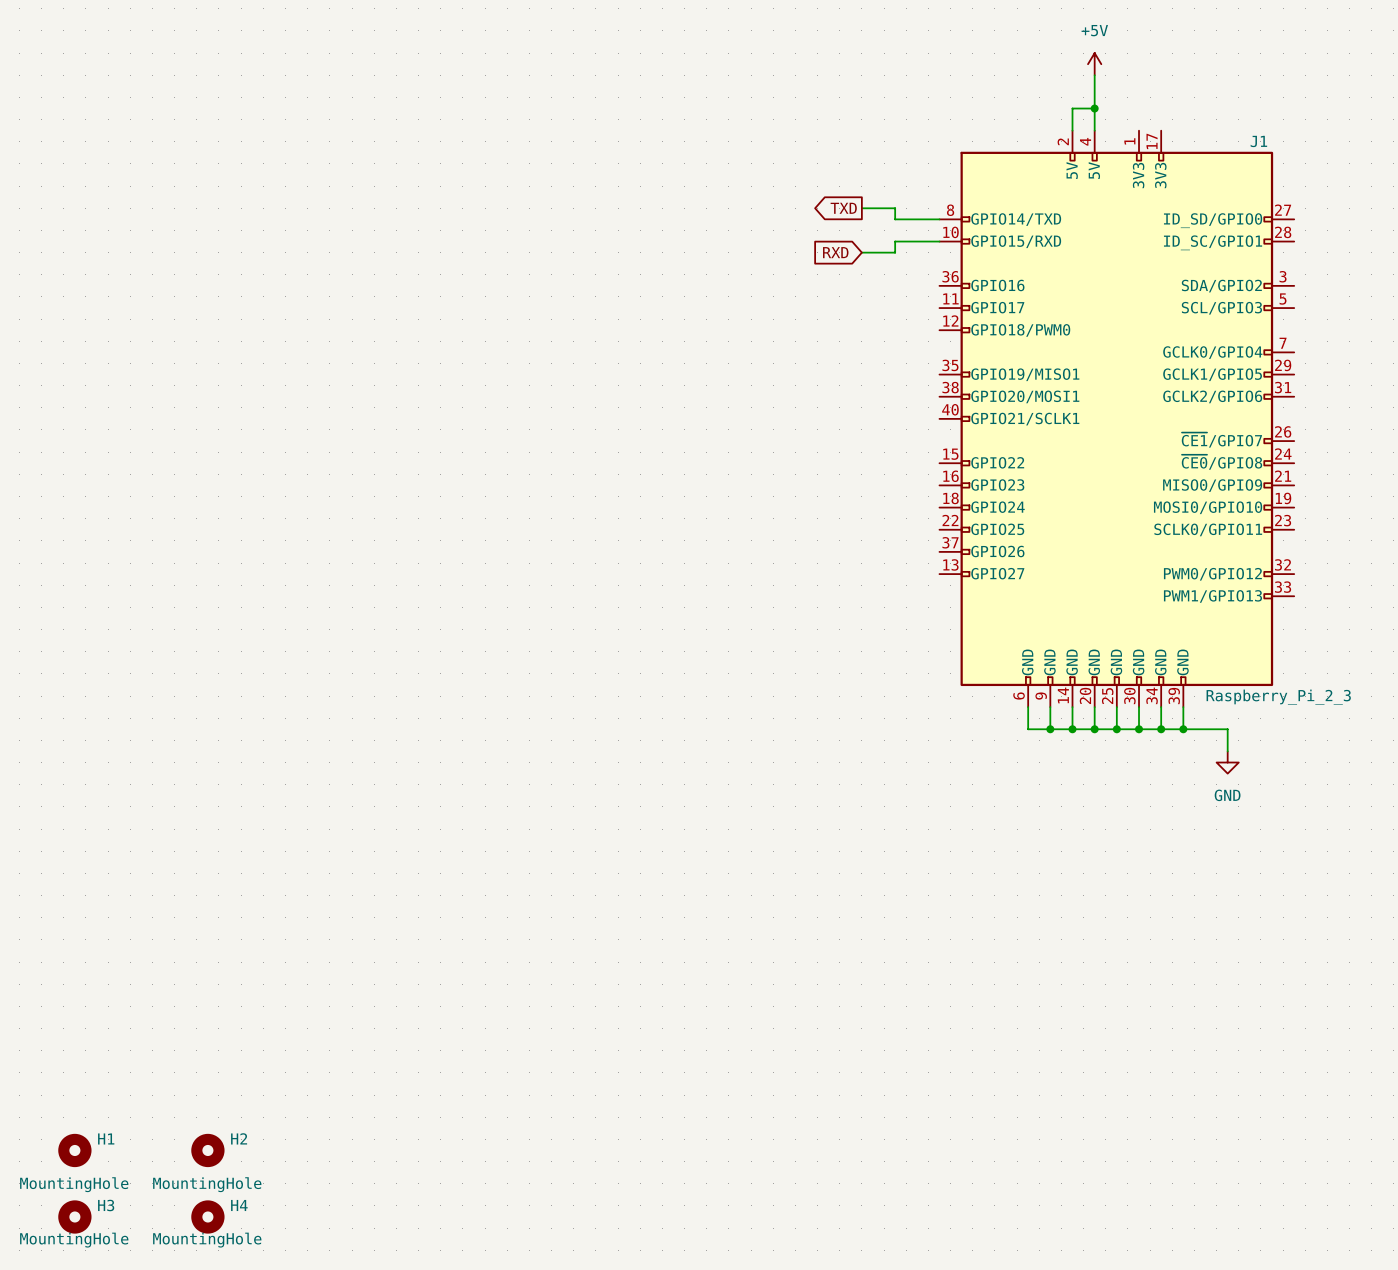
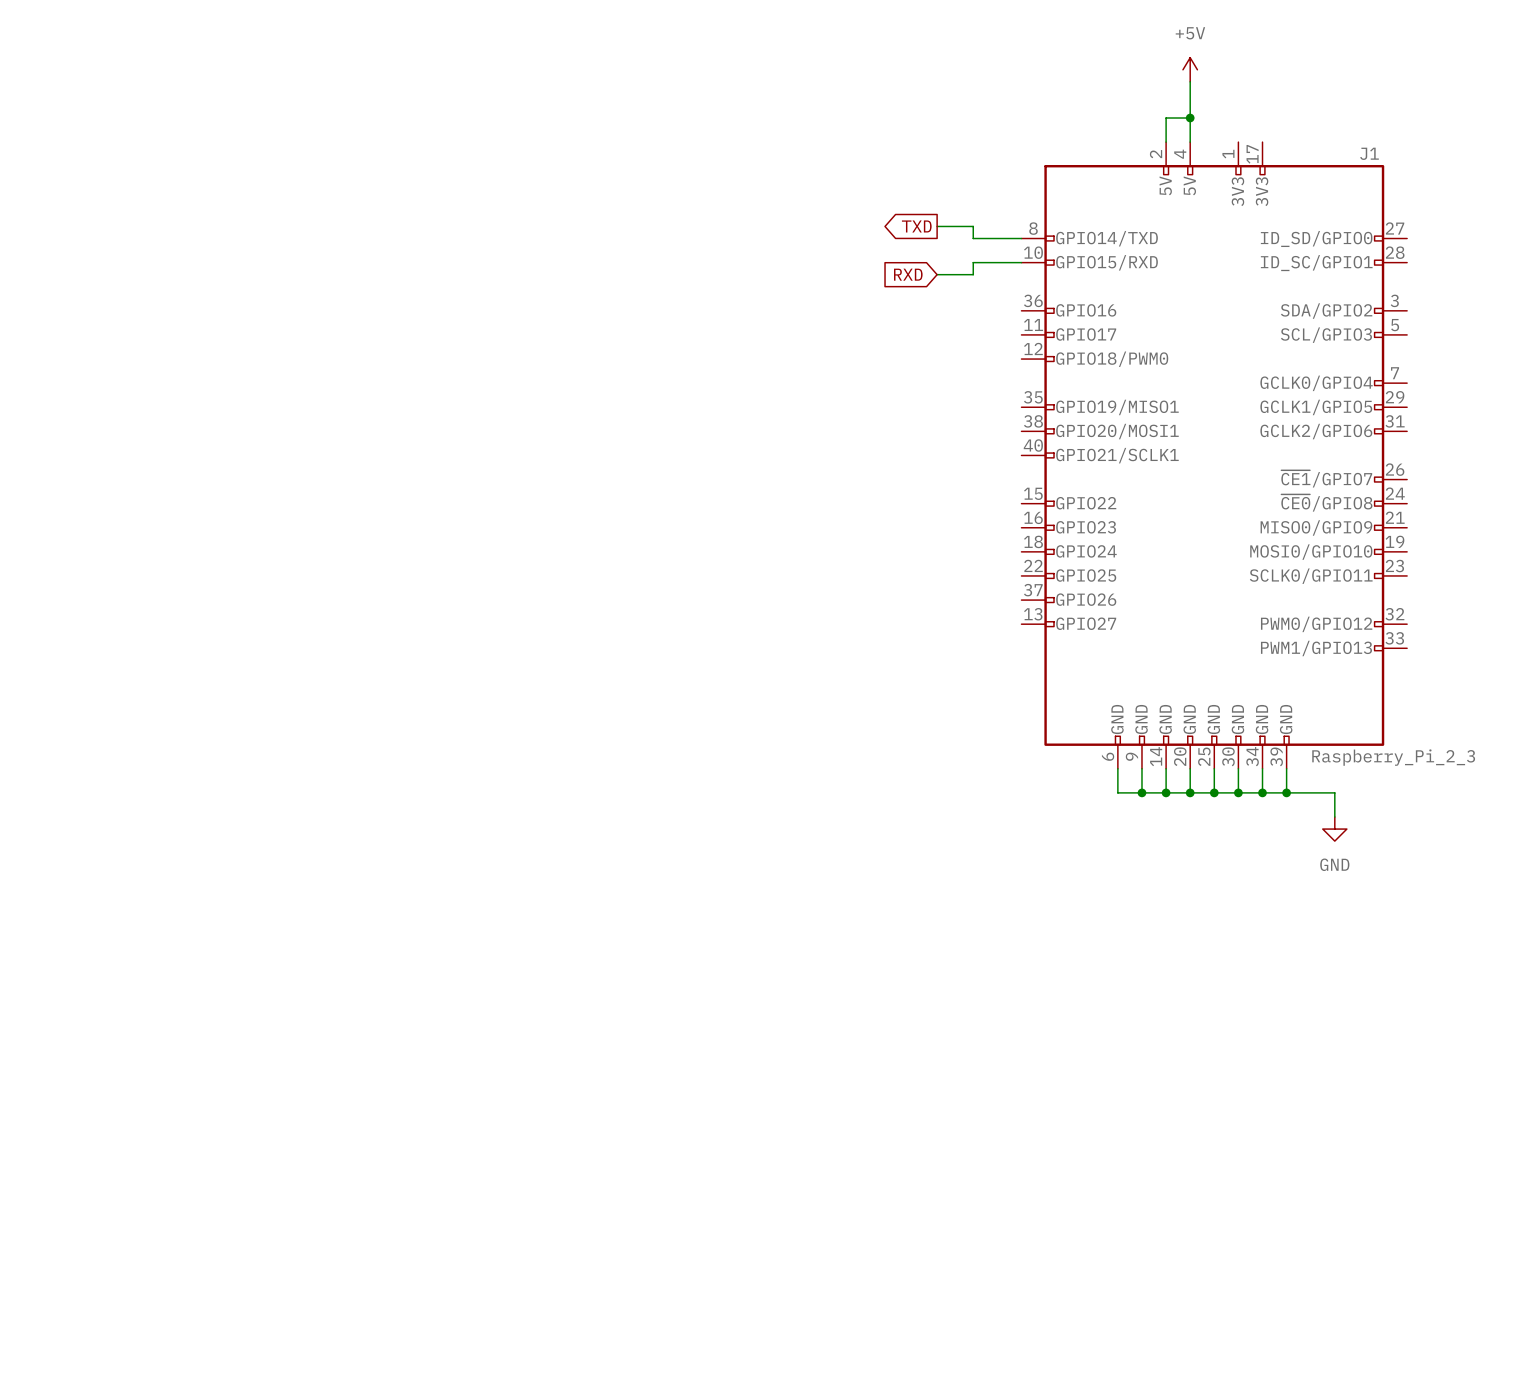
H1: MountingHole (74, 1150) -> none
H2: MountingHole (207, 1150) -> none
H3: MountingHole (74, 1216) -> none
H4: MountingHole (207, 1216) -> none

